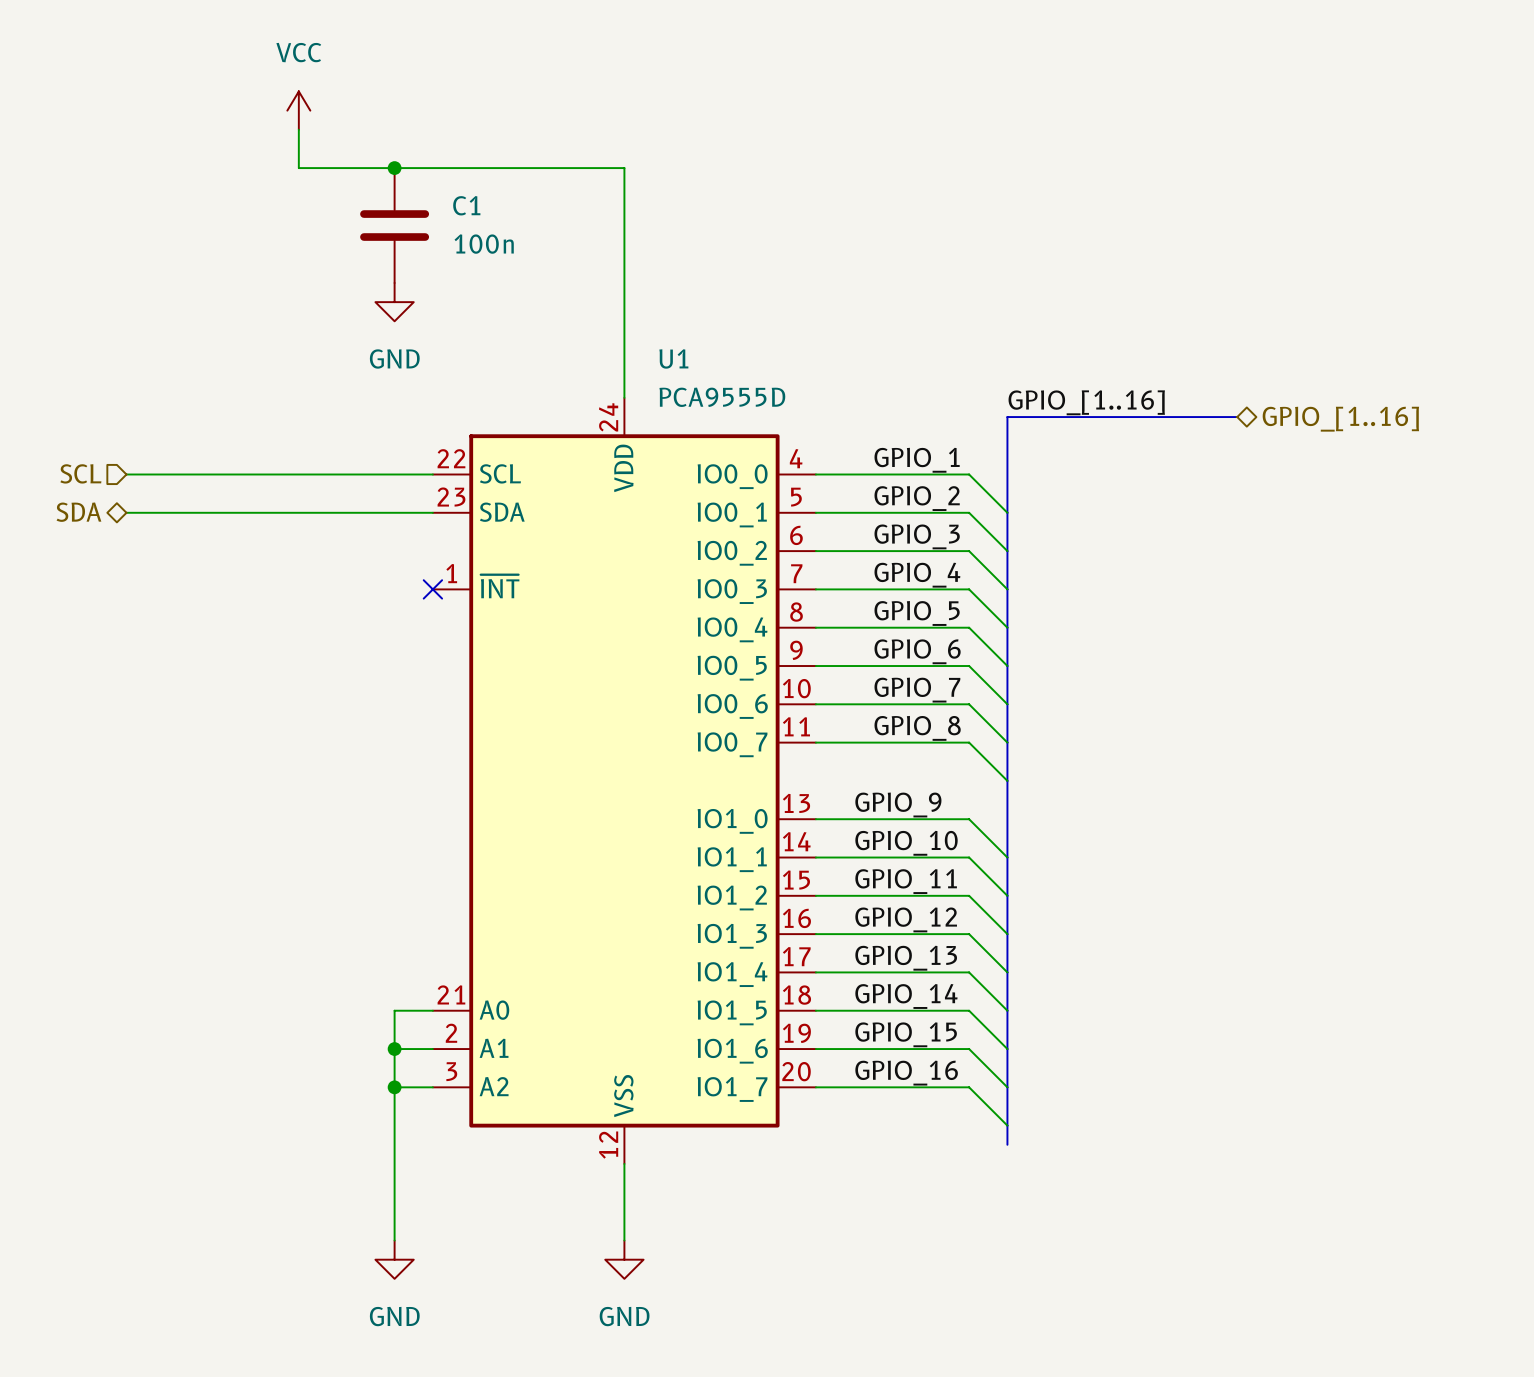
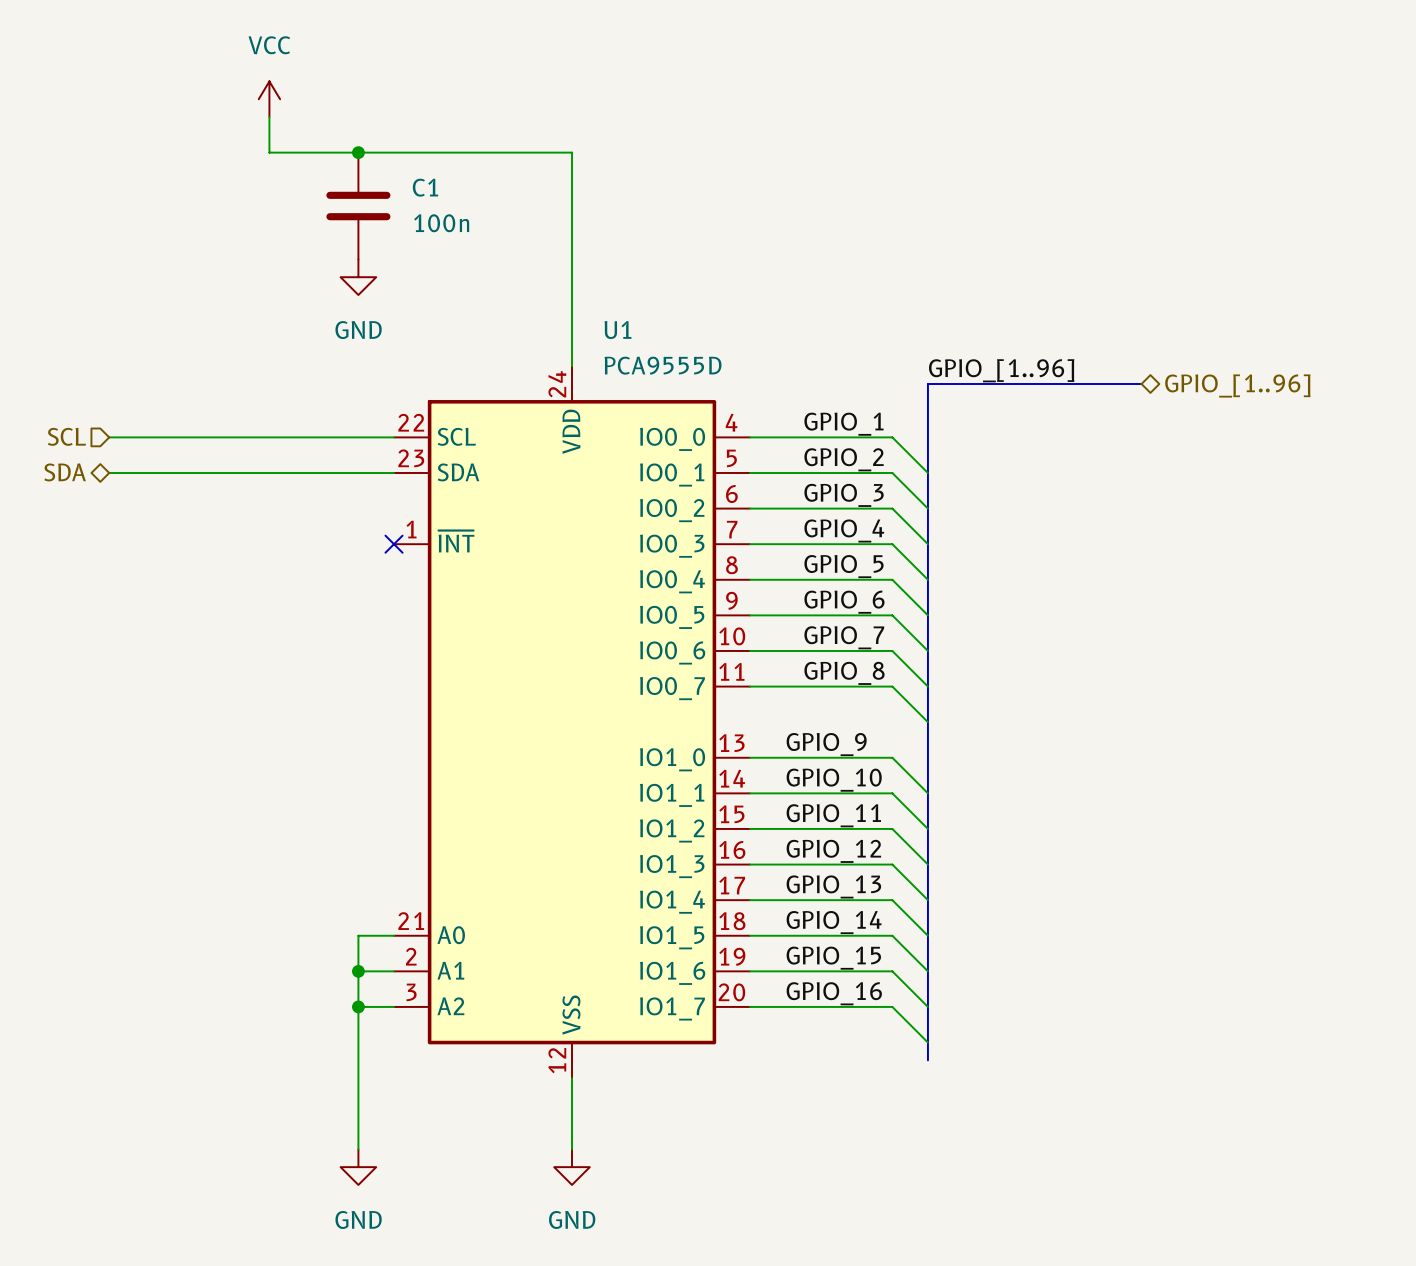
label: GPIO_[1..16] (1086, 402) -> GPIO_[1..96] (1001, 370)
hierarchical label: GPIO_[1..16] (1340, 419) -> GPIO_[1..96] (1237, 386)

